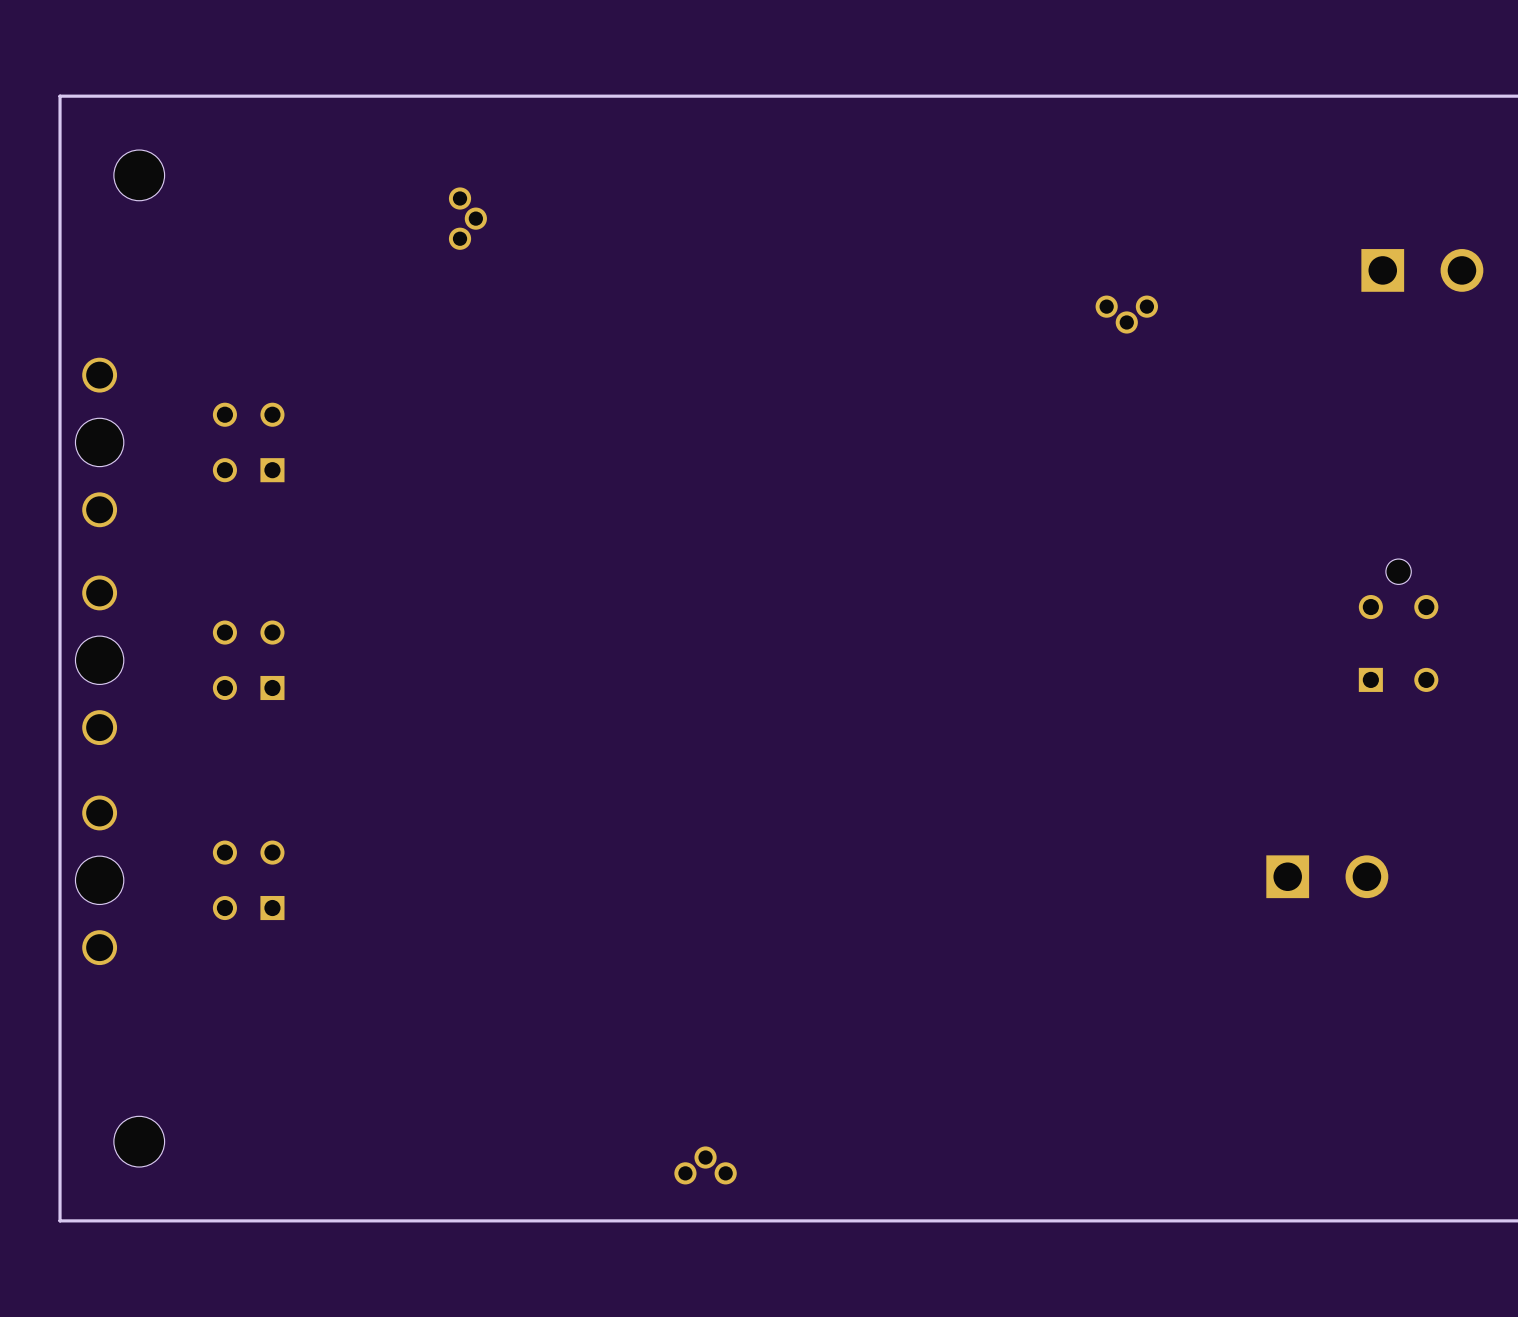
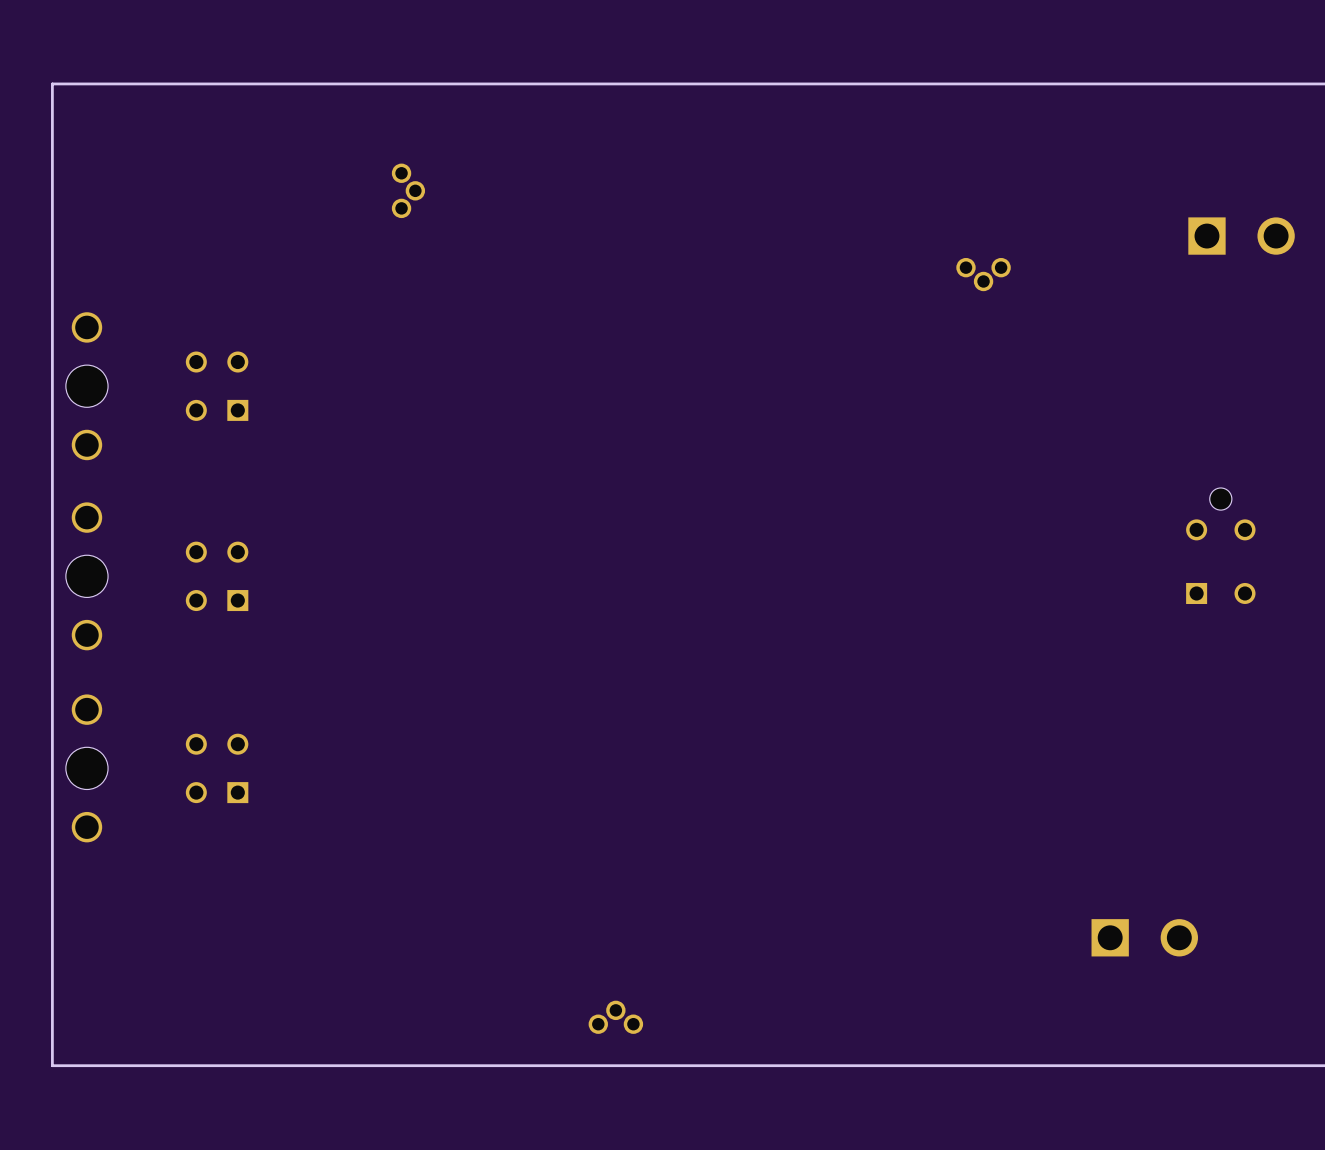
part: (139, 175) -> none
part position: (1327, 876) -> (1144, 937)
part: (139, 1141) -> none

